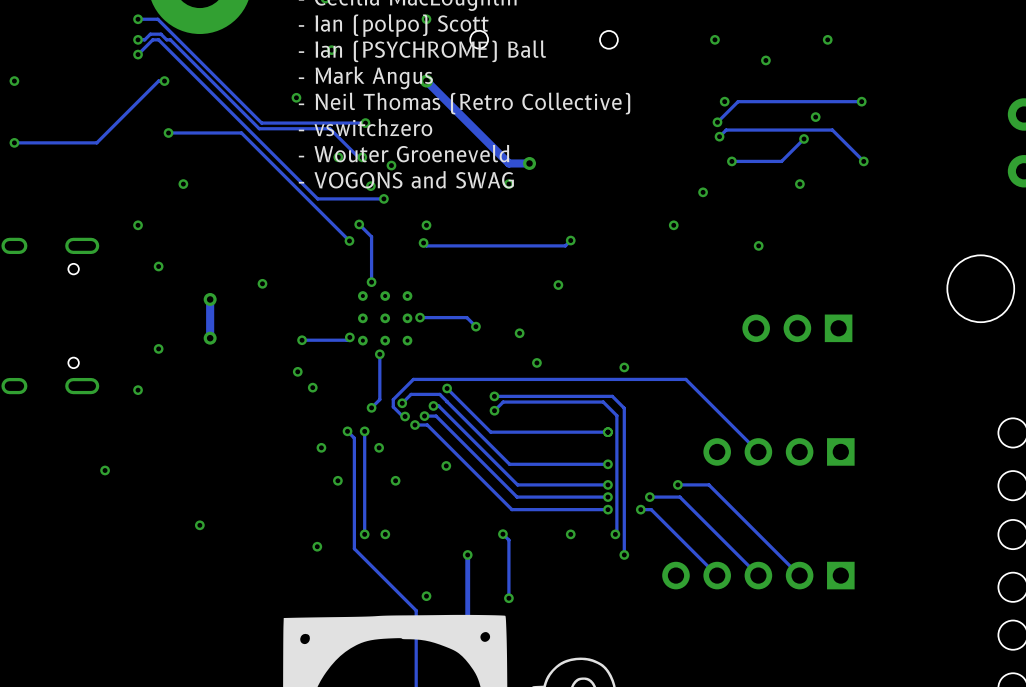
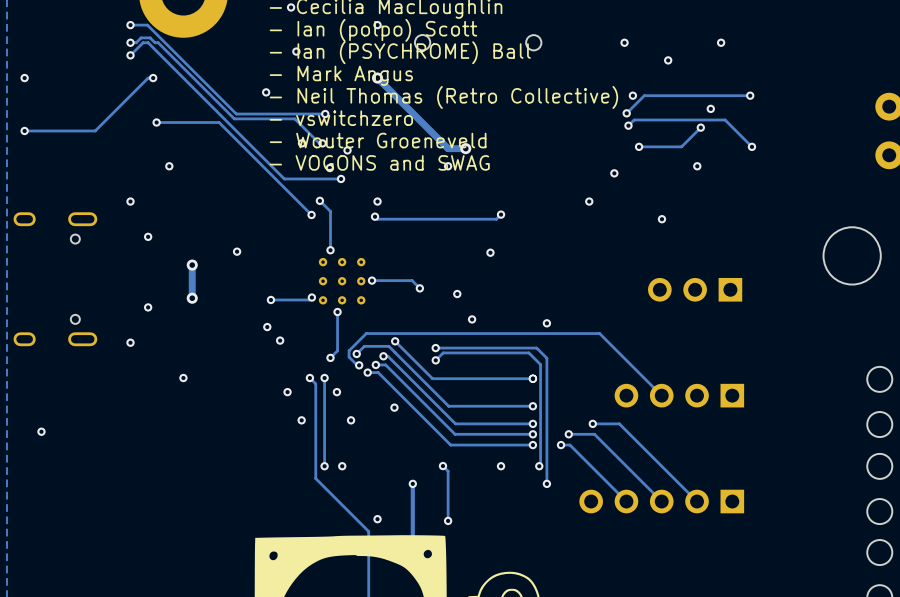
via: none -> (183, 378)
via: (105, 470) -> none
via: none -> (41, 431)
via: (199, 525) -> none
via: (317, 546) -> none

